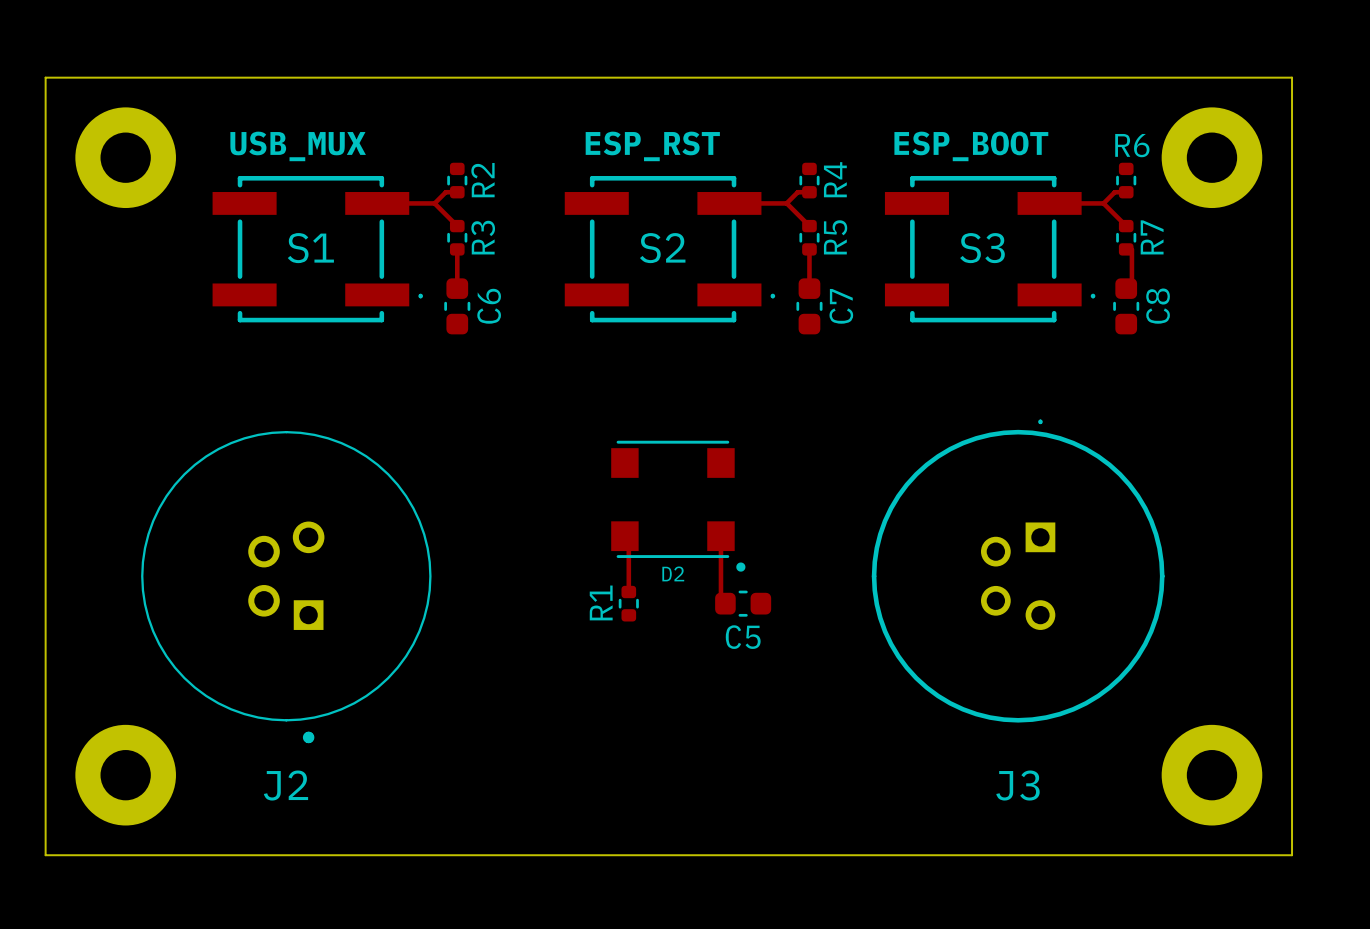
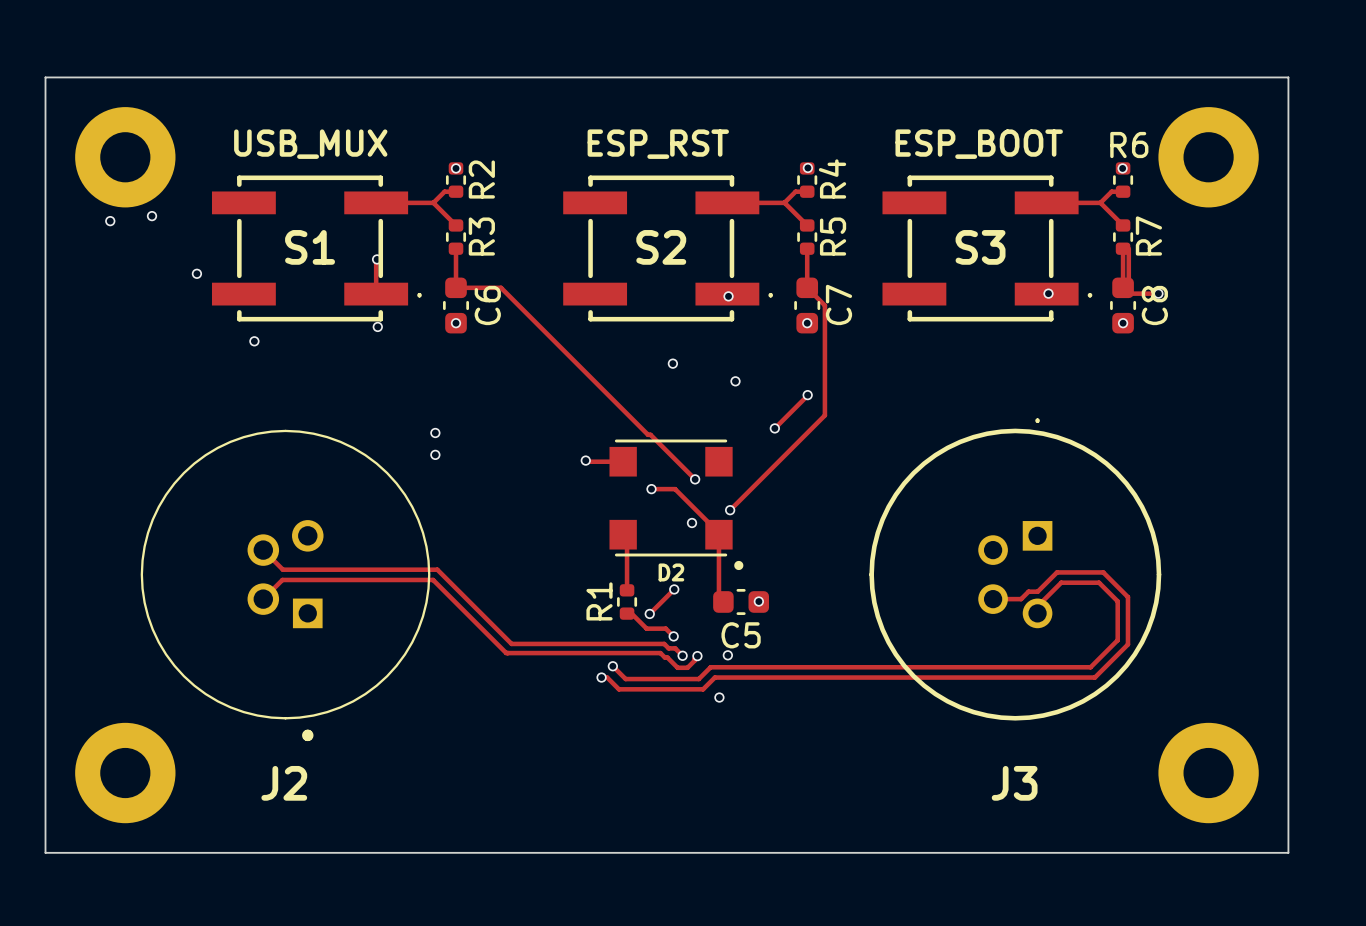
via: none -> (456, 168)
via: none -> (807, 167)
via: none -> (1122, 168)
via: none -> (152, 216)
via: none -> (110, 221)
track: none -> (1123, 248) (1123, 287) (1128, 293) (1158, 293)
track: none -> (377, 259) (376, 294)
via: none -> (377, 259)
via: none -> (196, 273)
track: none -> (456, 287) (501, 287) (695, 479)
track: none -> (807, 287) (824, 305) (824, 415) (730, 510)
via: none -> (1048, 293)
via: none -> (1158, 293)
via: none -> (728, 296)
via: none -> (456, 323)
via: none -> (807, 323)
via: none -> (1123, 323)
via: none -> (377, 326)
via: none -> (254, 341)
via: none -> (672, 363)
via: none -> (735, 381)
track: none -> (807, 395) (774, 428)
via: none -> (807, 395)
via: none -> (774, 428)
via: none -> (435, 432)
via: none -> (435, 454)
track: none -> (585, 460) (623, 461)
via: none -> (585, 460)
via: none -> (695, 479)
track: none -> (651, 489) (675, 489) (718, 534)
via: none -> (651, 489)
via: none -> (730, 510)
via: none -> (692, 522)
track: none -> (263, 550) (282, 569) (437, 569) (511, 643) (664, 643) (668, 648) (675, 648) (682, 655)
track: none -> (674, 589) (649, 613)
via: none -> (674, 589)
track: none -> (263, 599) (282, 579) (433, 579) (506, 653) (660, 653) (677, 667) (687, 667) (697, 656)
track: none -> (993, 599) (1021, 599) (1028, 591) (1037, 591) (1056, 572) (1103, 572) (1127, 597) (1127, 644) (1094, 677) (714, 677) (703, 689) (618, 689) (607, 677) (601, 677)
via: none -> (758, 601)
track: none -> (627, 613) (631, 613) (646, 628) (665, 628) (673, 636)
via: none -> (649, 613)
track: none -> (1037, 613) (1037, 606) (1061, 582) (1099, 582) (1117, 601) (1117, 640) (1090, 667) (710, 667) (698, 679) (625, 679) (612, 666)
via: none -> (673, 636)
via: none -> (682, 655)
via: none -> (697, 656)
via: none -> (727, 655)
via: none -> (612, 666)
via: none -> (601, 677)
via: none -> (719, 697)

